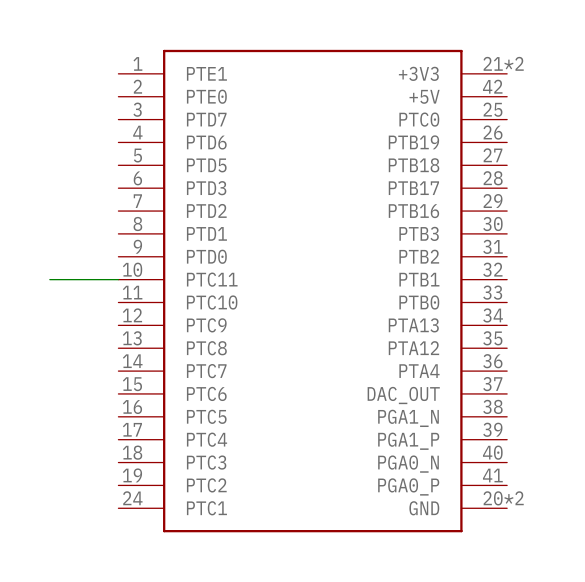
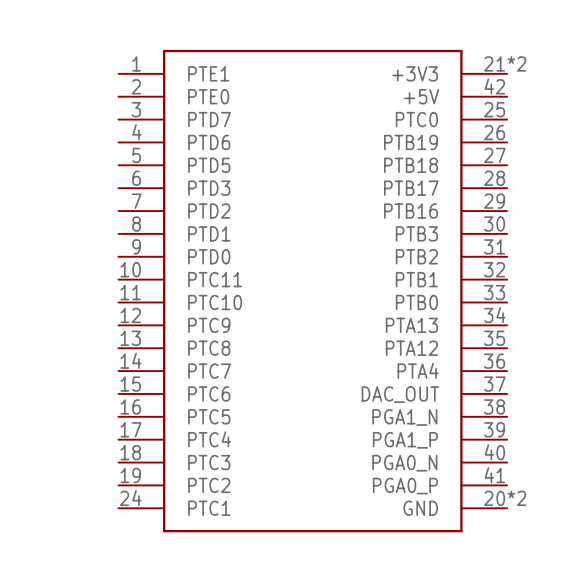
wire: (49, 279) (118, 279) -> none

